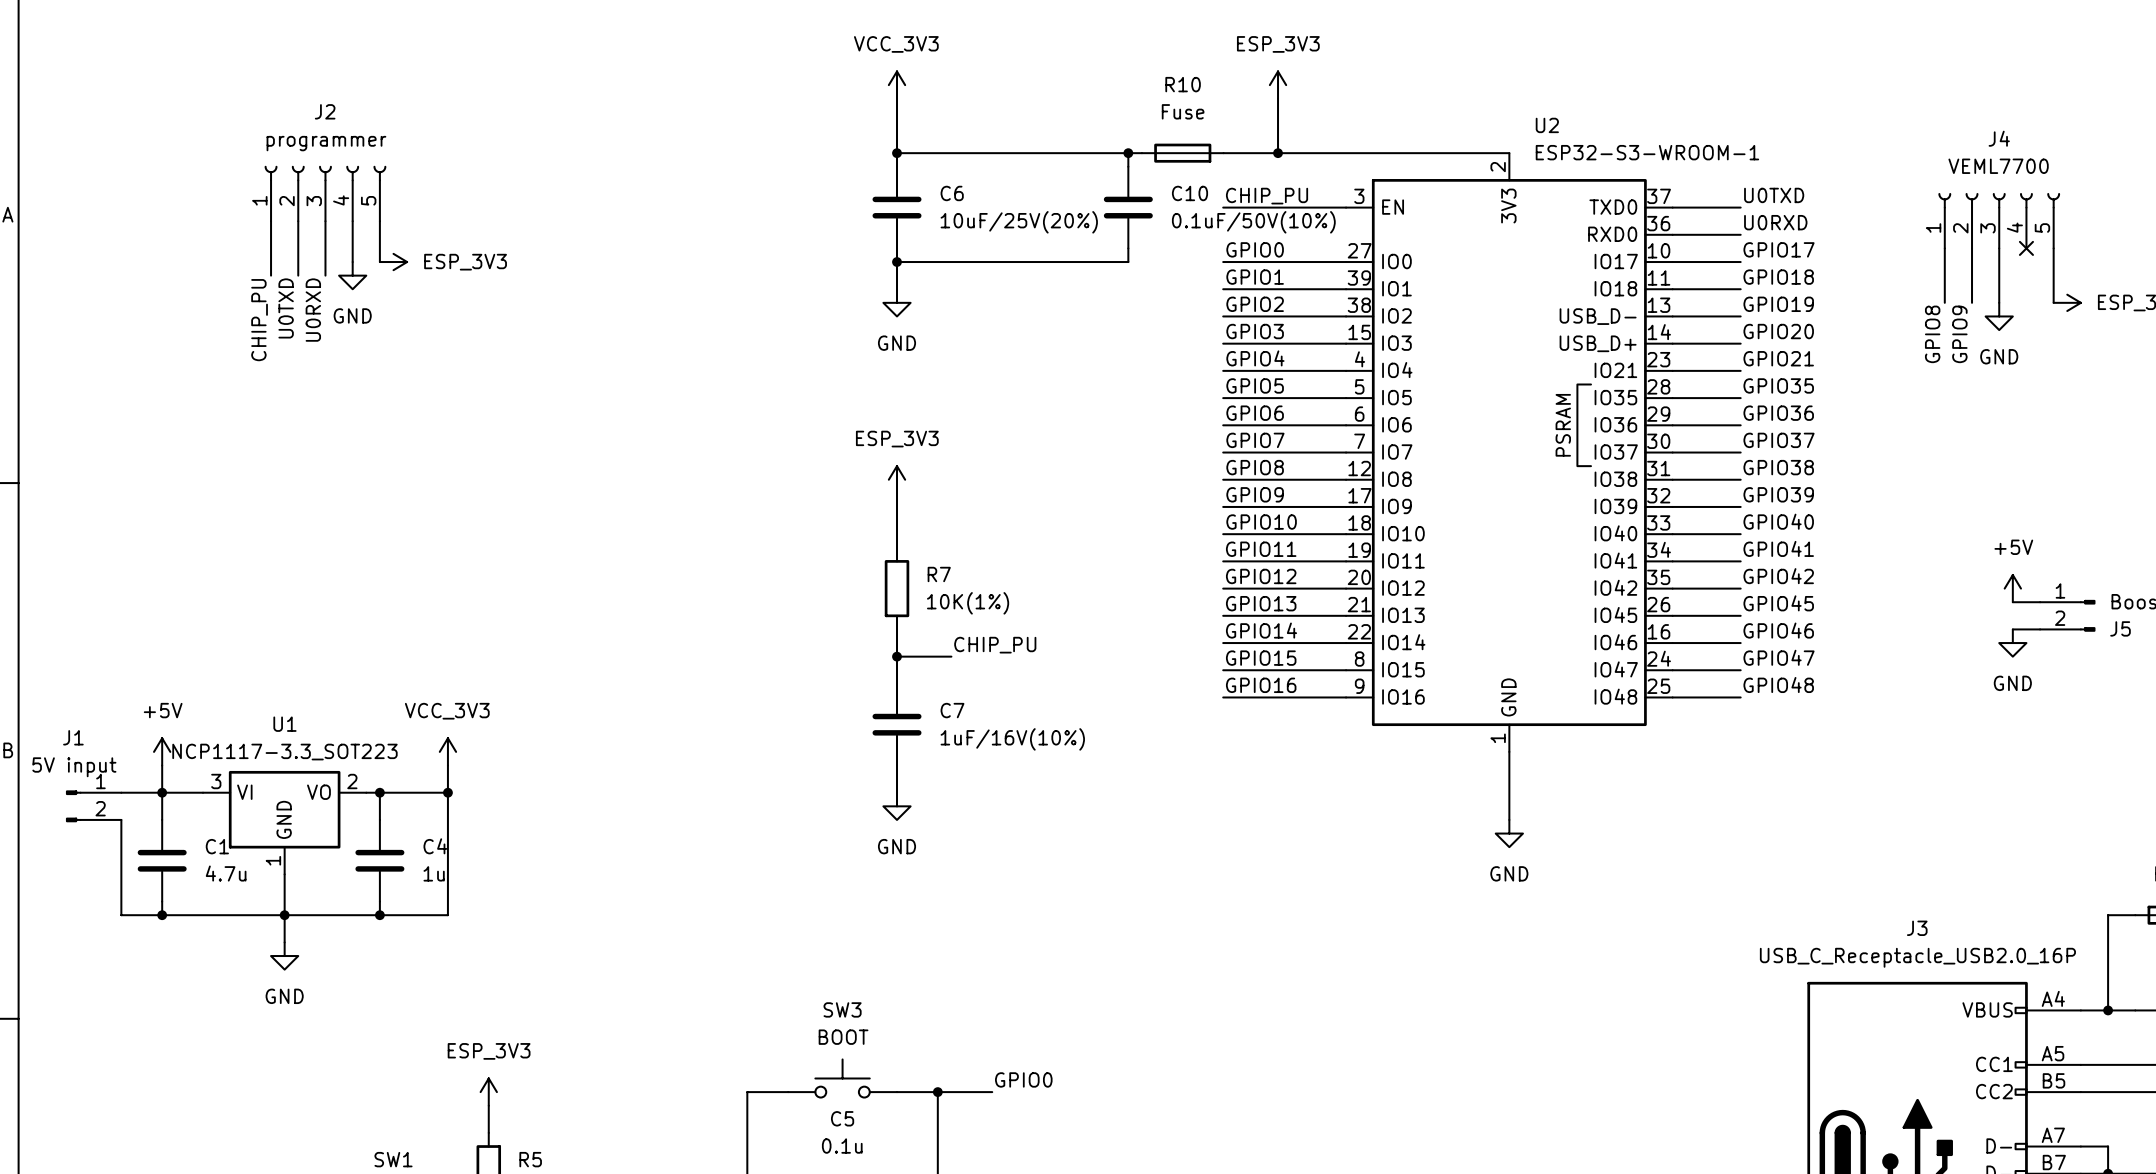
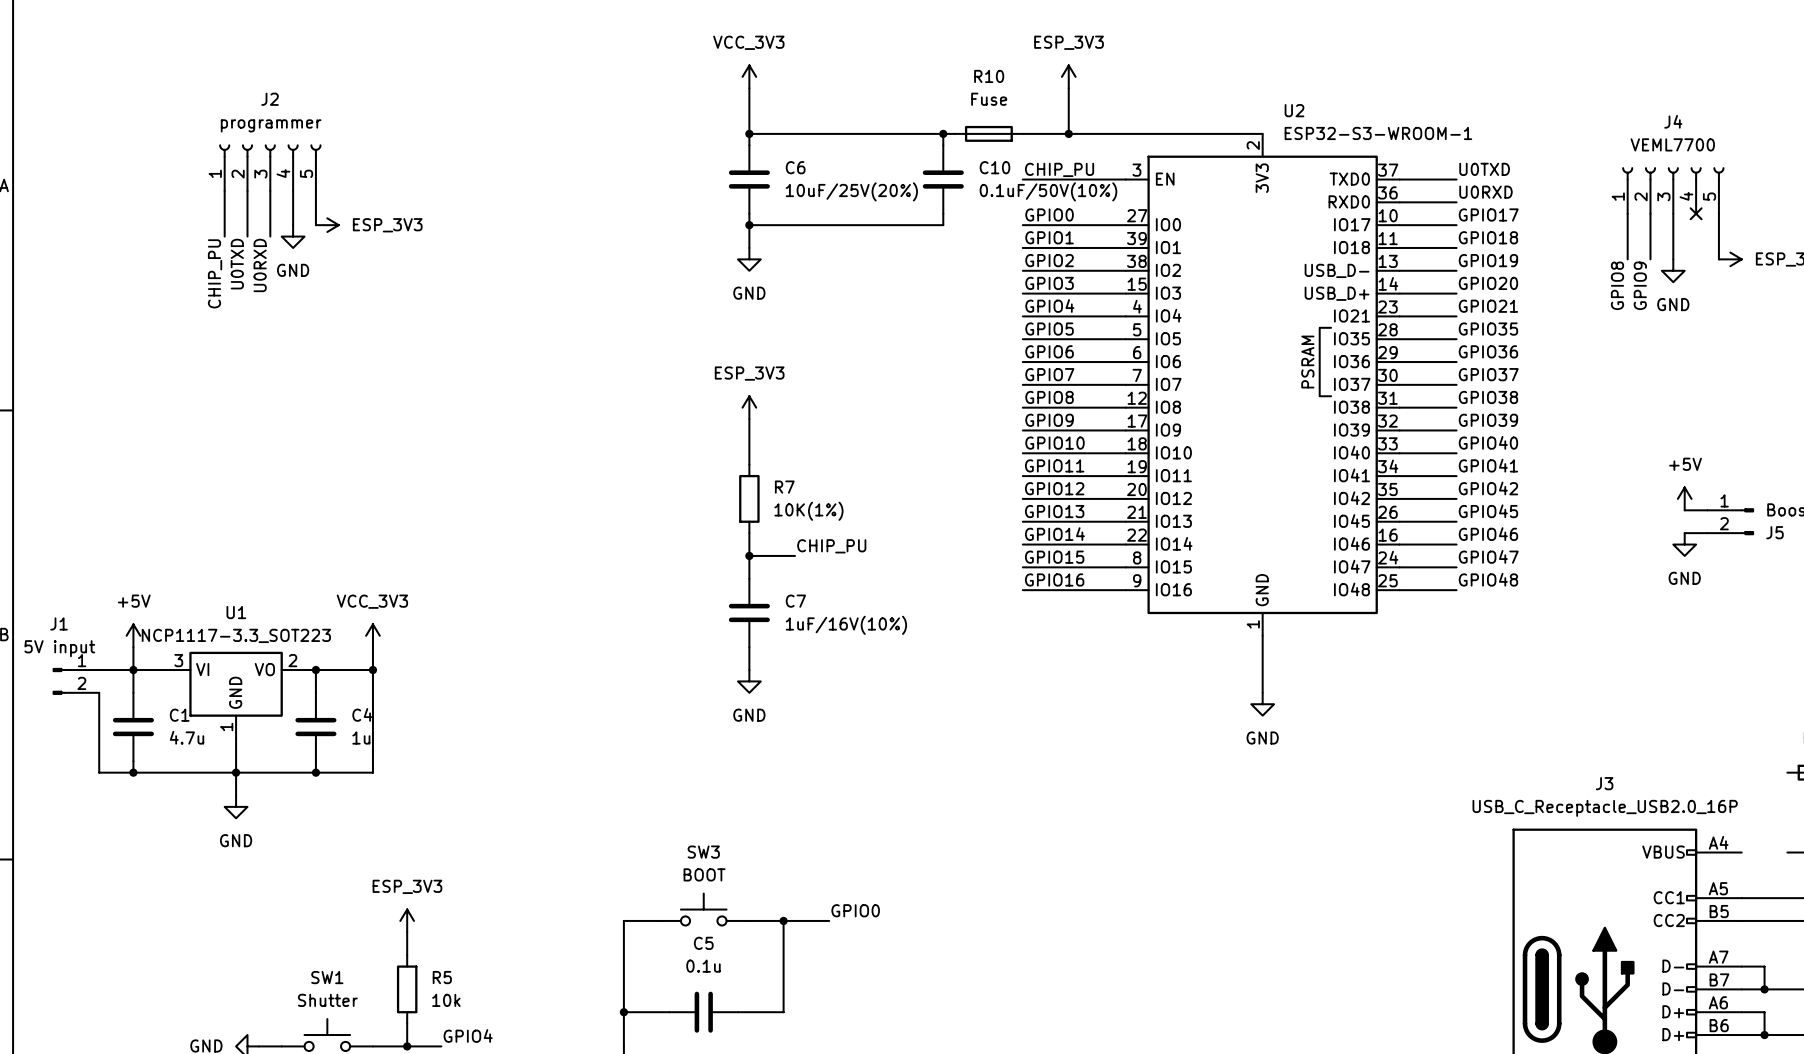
wire: (2135, 915) (2108, 915) (2108, 1010) -> none
wire: (2080, 1010) (2135, 1010) -> none
junction: (2108, 1010) -> none

